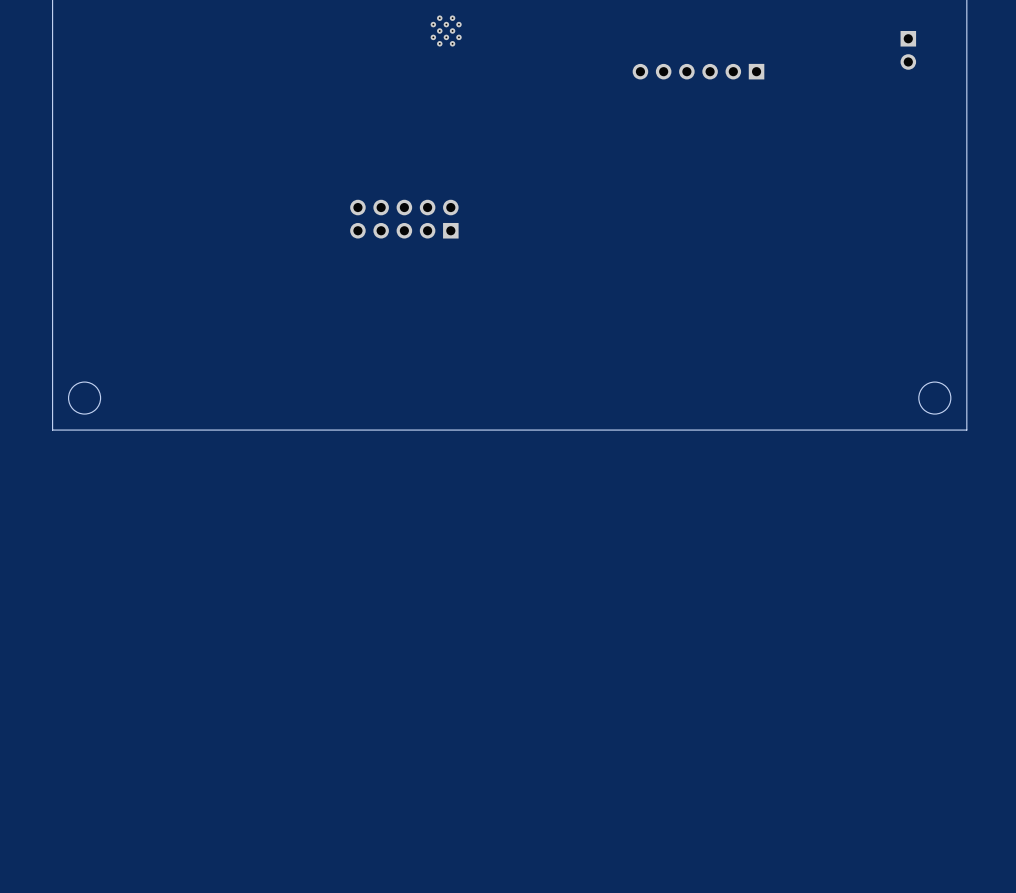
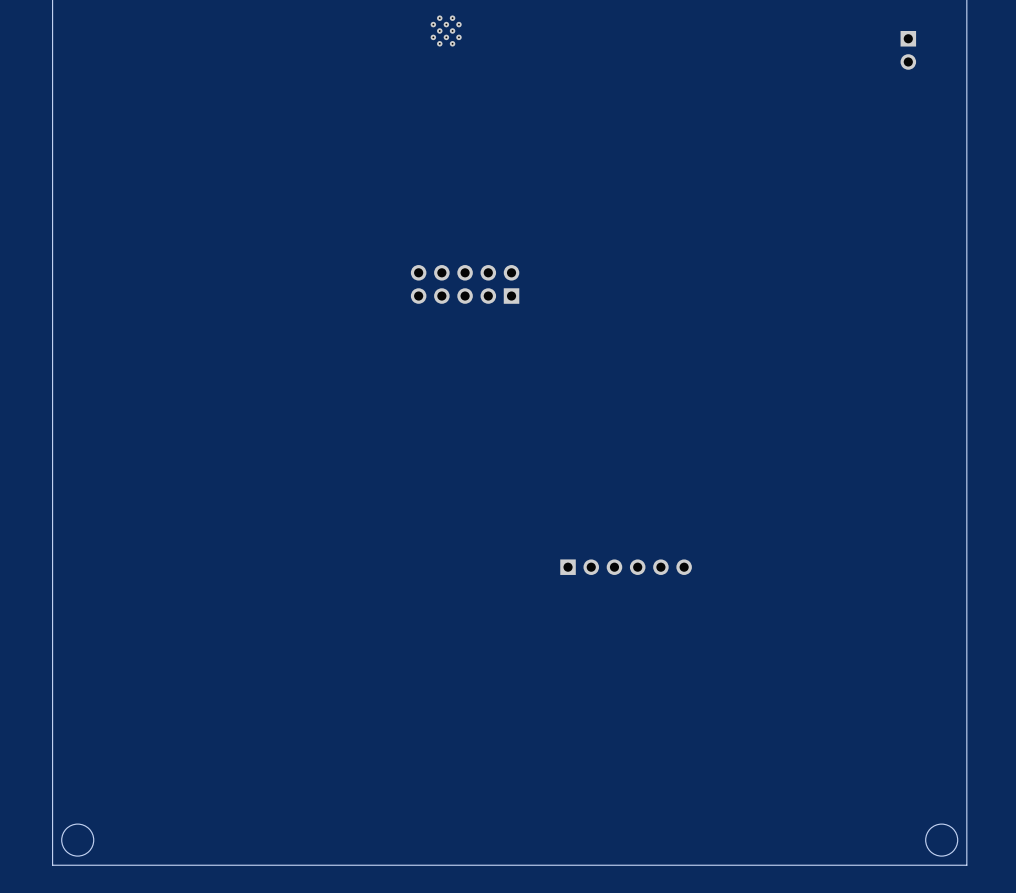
part: (698, 71) -> none
part position: (404, 219) -> (465, 284)
round board edge: [68, 381, 101, 415] -> none
round board edge: [918, 381, 952, 415] -> none
board edge: (966, 430) (52, 430) -> (966, 430) (966, 865) (52, 865) (52, 430)
part: none -> (626, 567)
round board edge: none -> [61, 823, 94, 857]
round board edge: none -> [925, 823, 958, 857]

